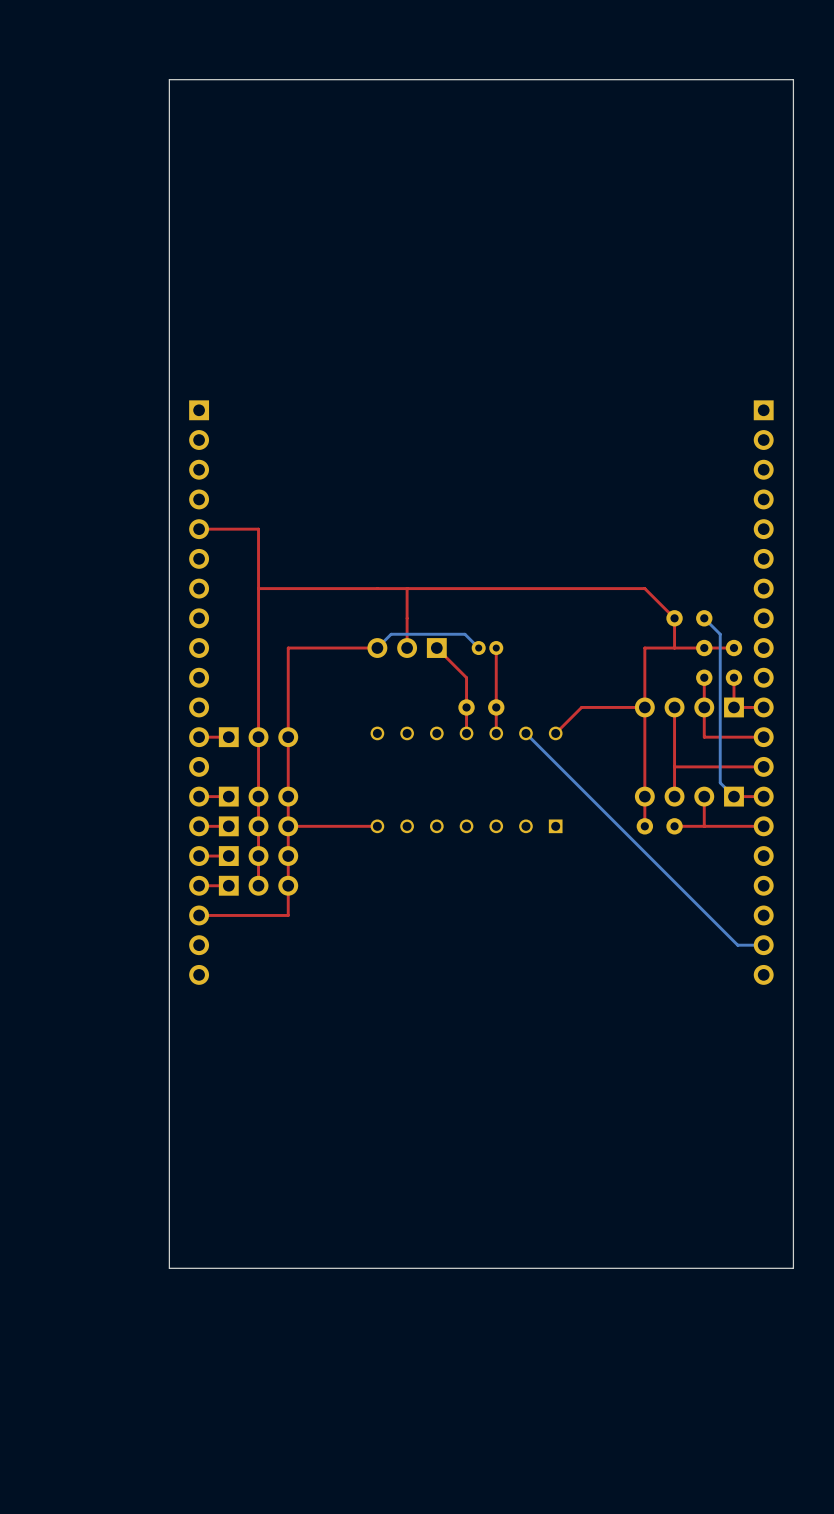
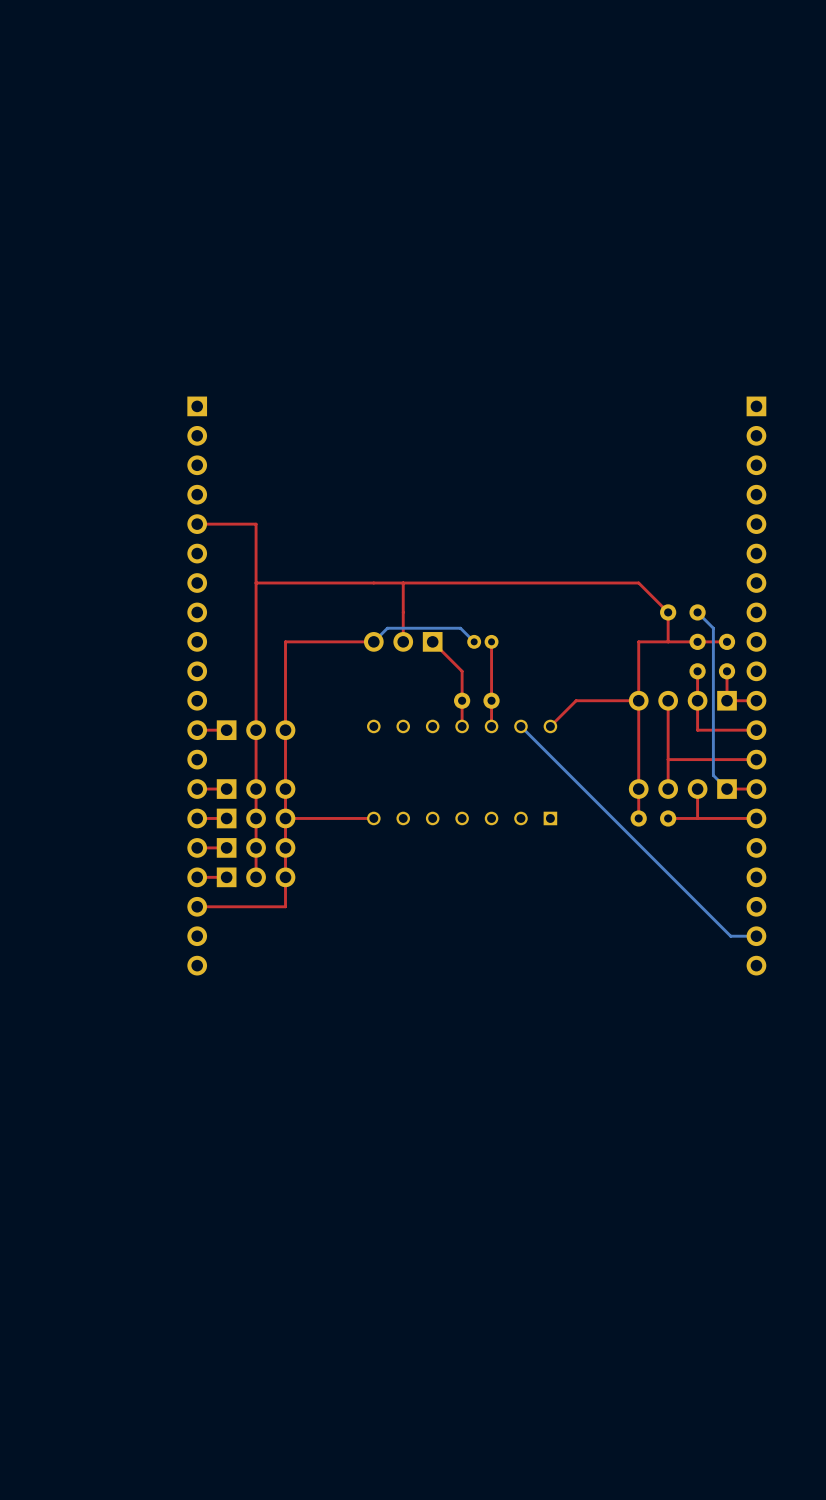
board edge: (793, 79) (169, 79) (169, 1268) (793, 1268) (793, 79) -> none

